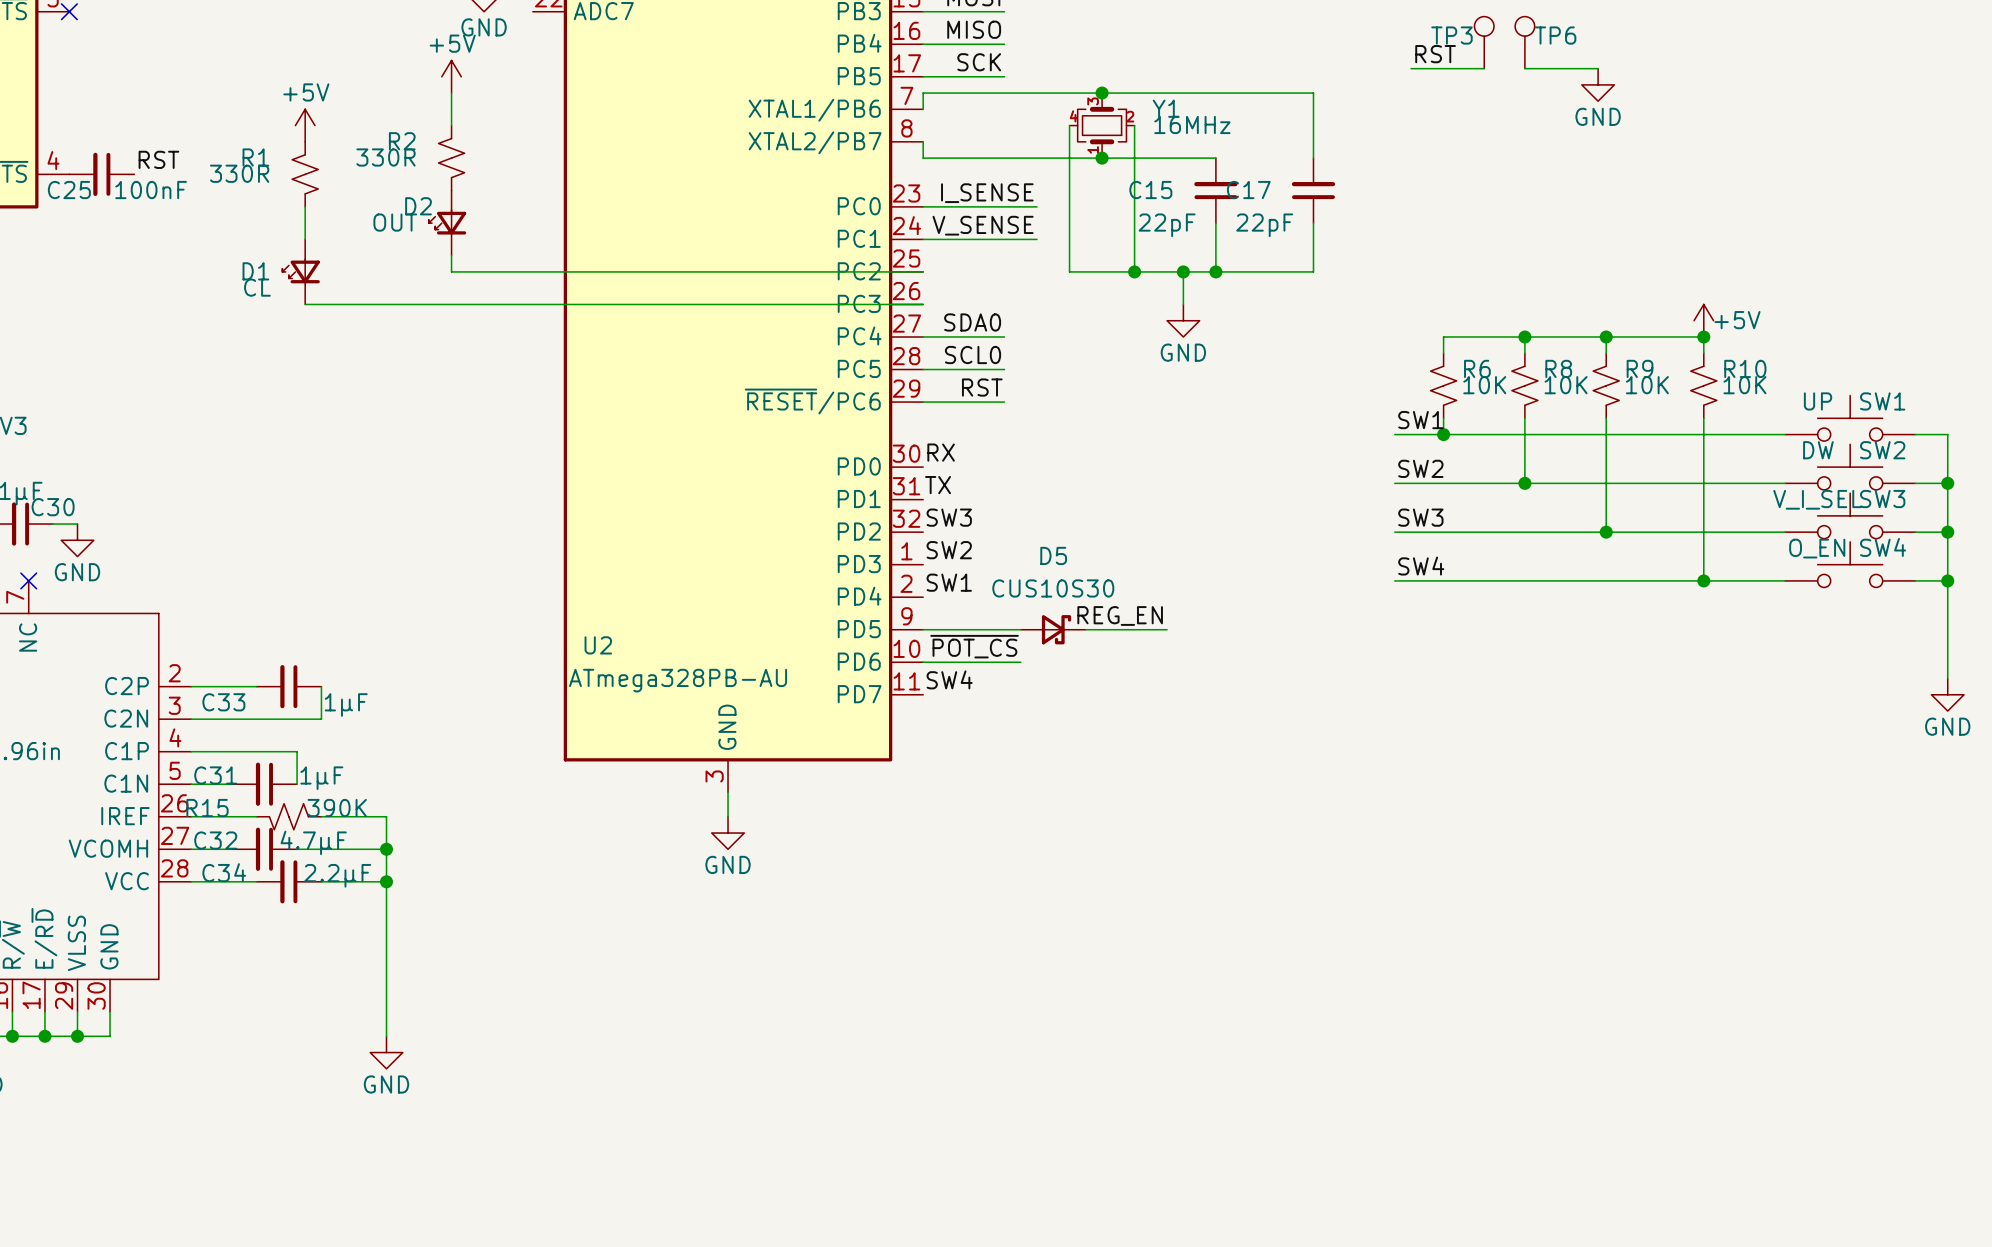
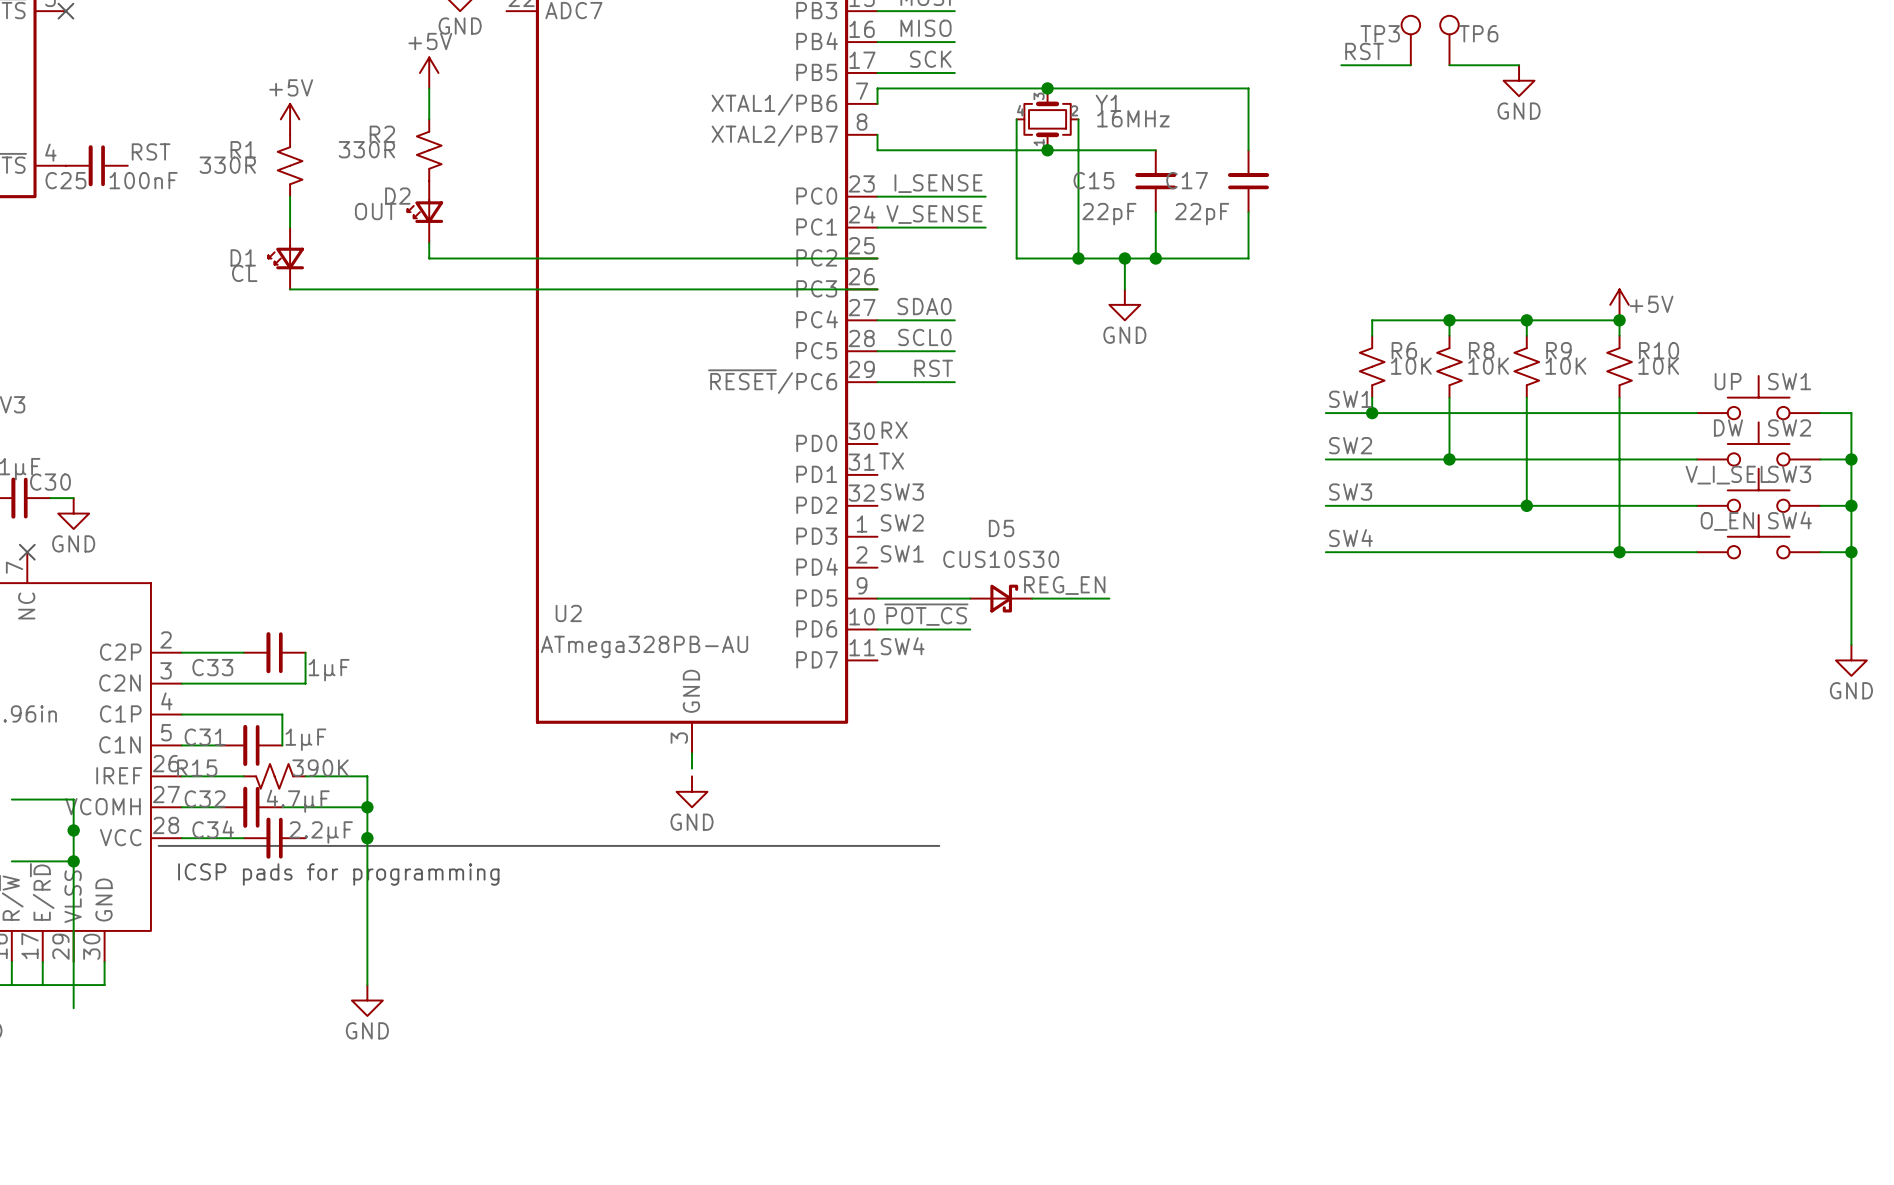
wire: (728, 808) (728, 816) -> none
wire: none -> (11, 799) (73, 799) (73, 961)
junction: none -> (73, 830)
wire: (321, 881) (386, 881) -> (11, 861) (73, 861)
line: none -> (158, 845) (939, 845)
junction: none -> (73, 861)
text: none -> ICSP pads for programming (338, 874)
junction: (12, 1036) -> none
junction: (44, 1036) -> none
wire: none -> (73, 985) (73, 1008)
junction: (77, 1036) -> none

